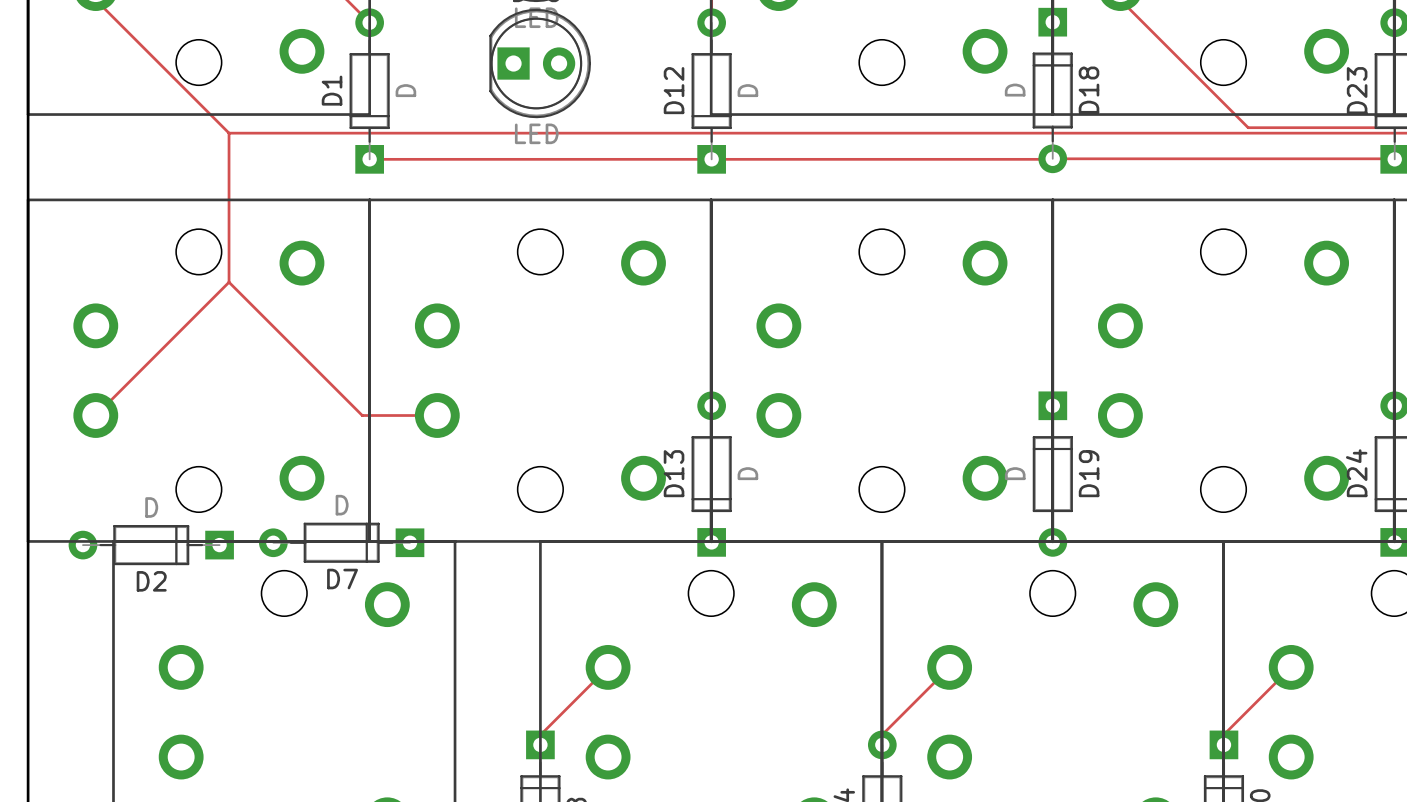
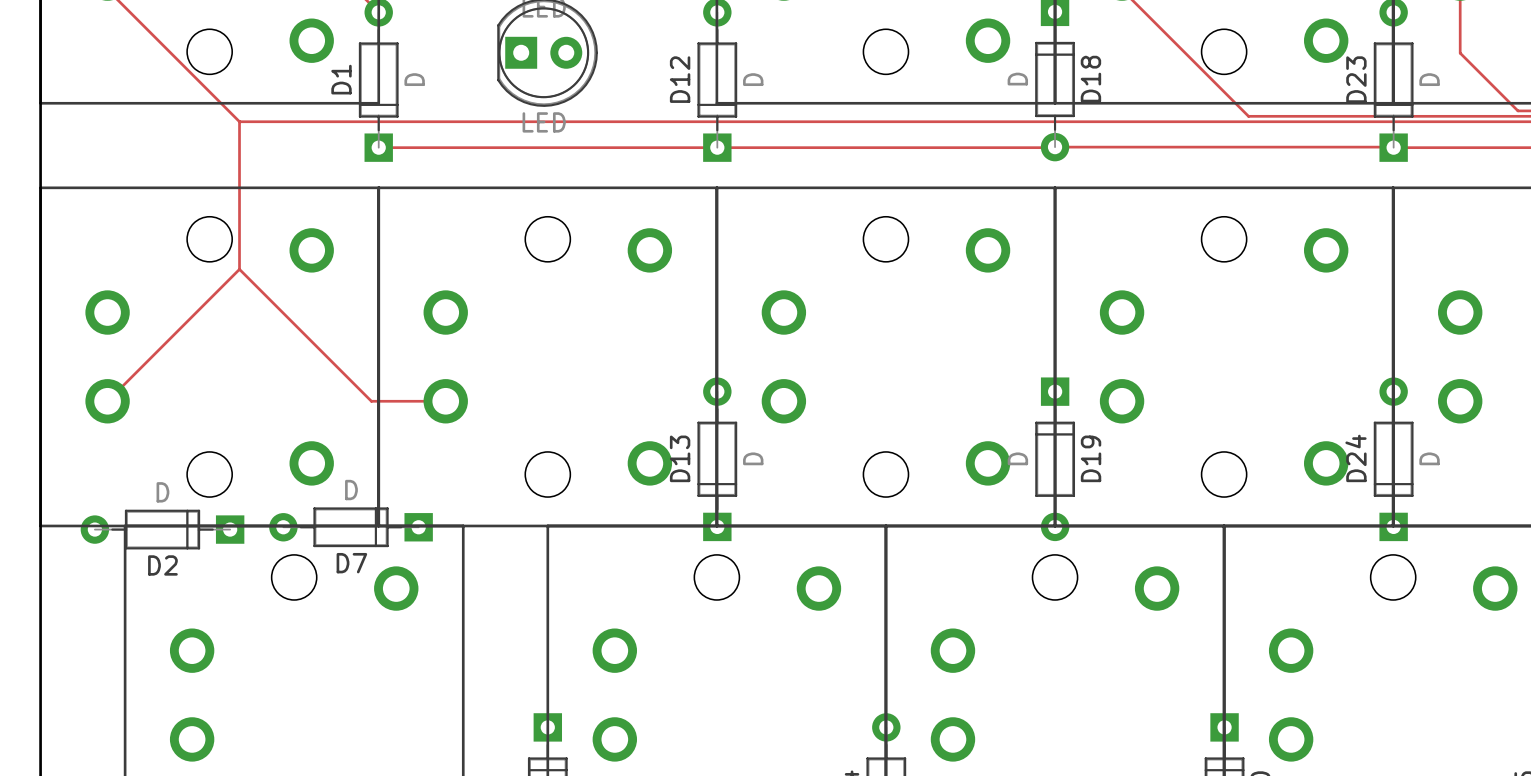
top track: (608, 667) (540, 735) (540, 744) -> none
top track: (949, 667) (882, 734) (882, 744) -> none
top track: (1291, 667) (1223, 734) (1223, 744) -> none

